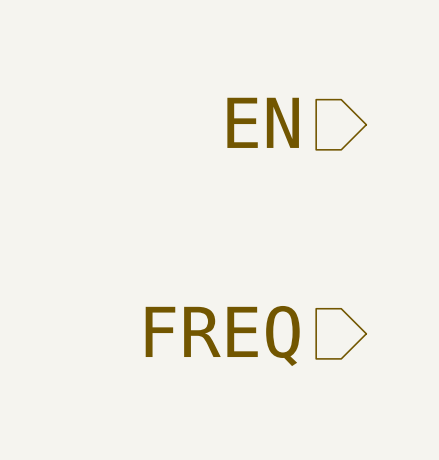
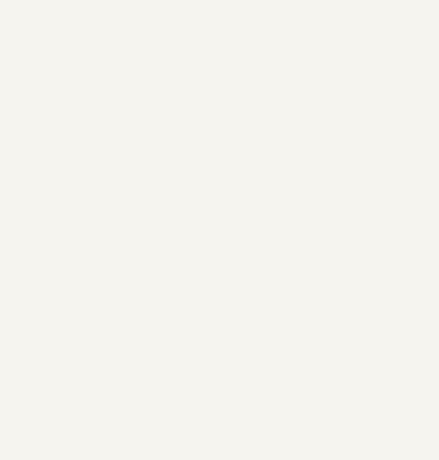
hierarchical label: EN (263, 122) -> none
hierarchical label: FREQ (222, 336) -> none

